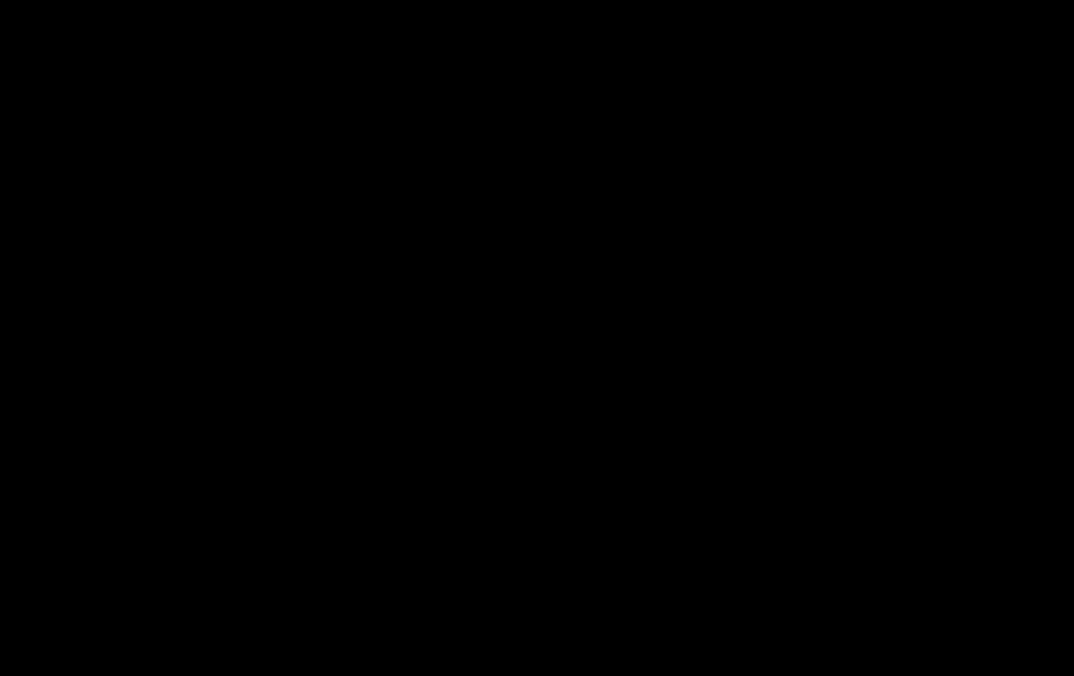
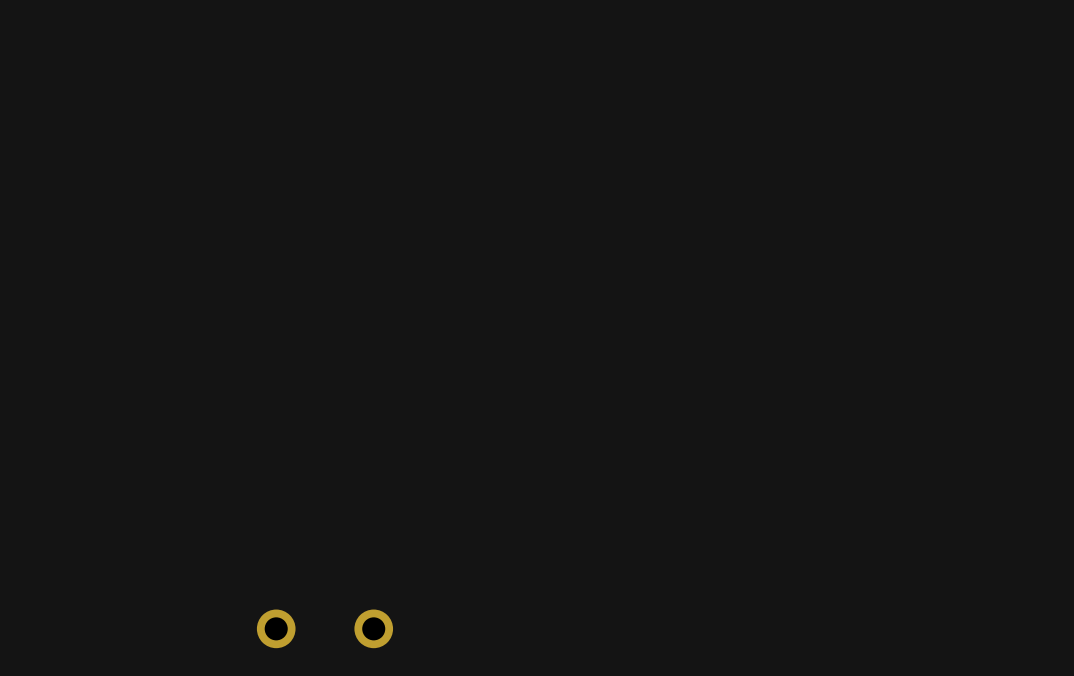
via: none -> (276, 628)
via: none -> (373, 628)

